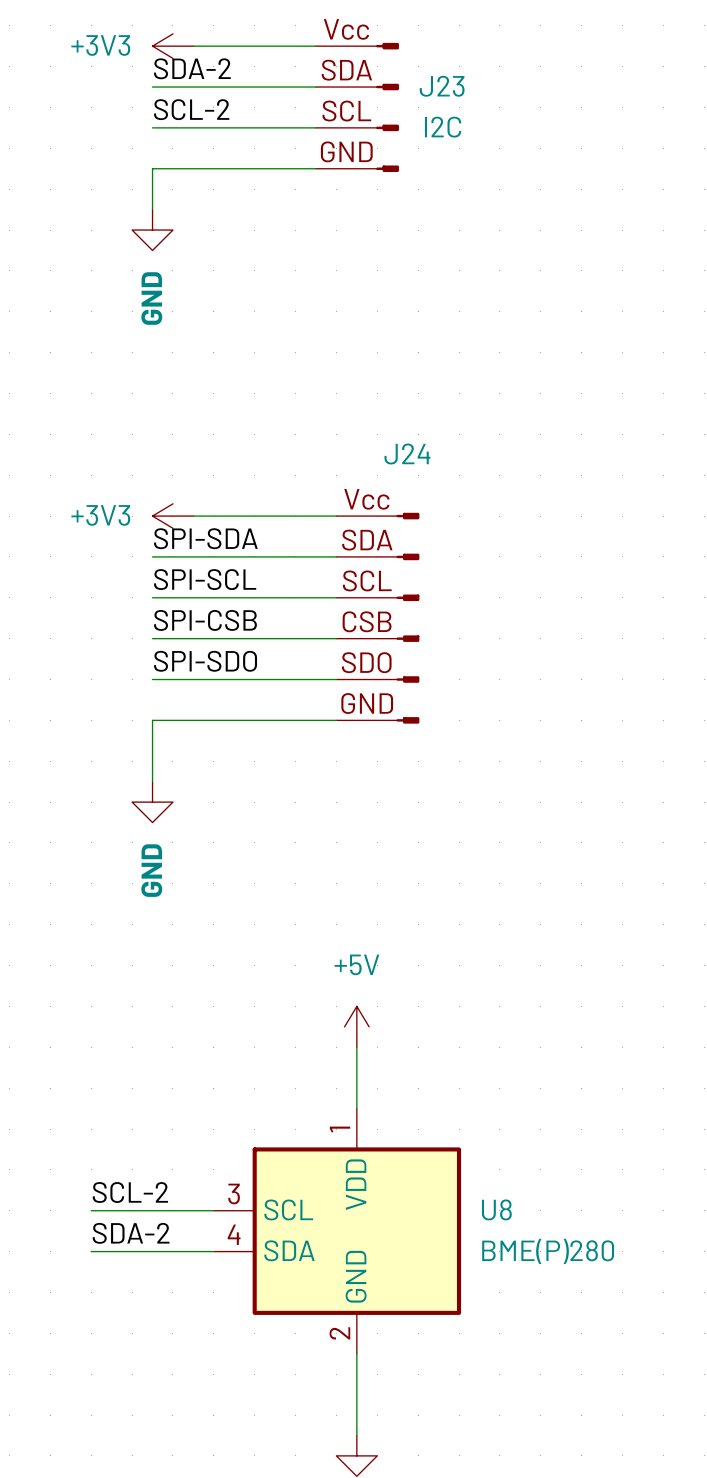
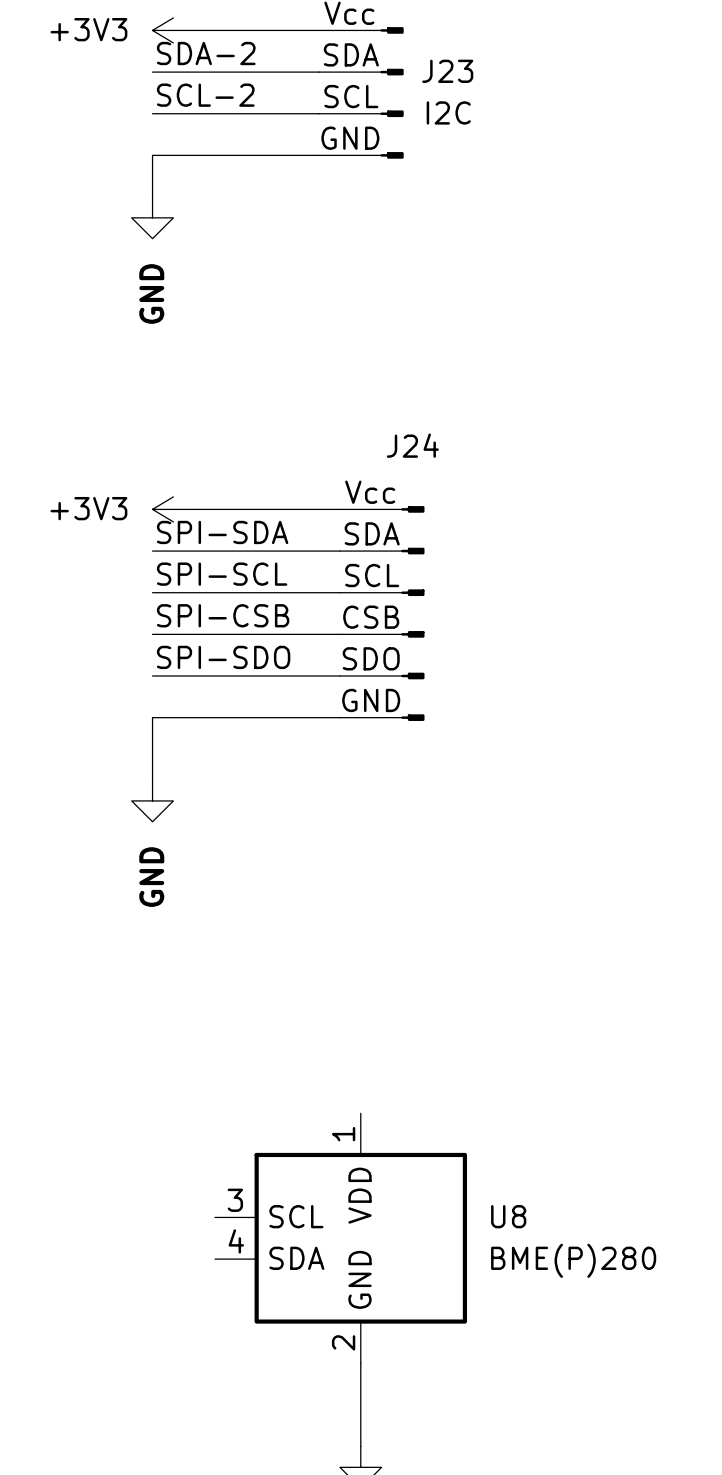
power symbol: +5V (356, 1026) -> none
wire: (356, 1047) (356, 1108) -> none
label: SCL-2 (130, 1192) -> none
wire: (91, 1210) (213, 1210) -> none
label: SDA-2 (131, 1233) -> none
wire: (91, 1251) (213, 1251) -> none

